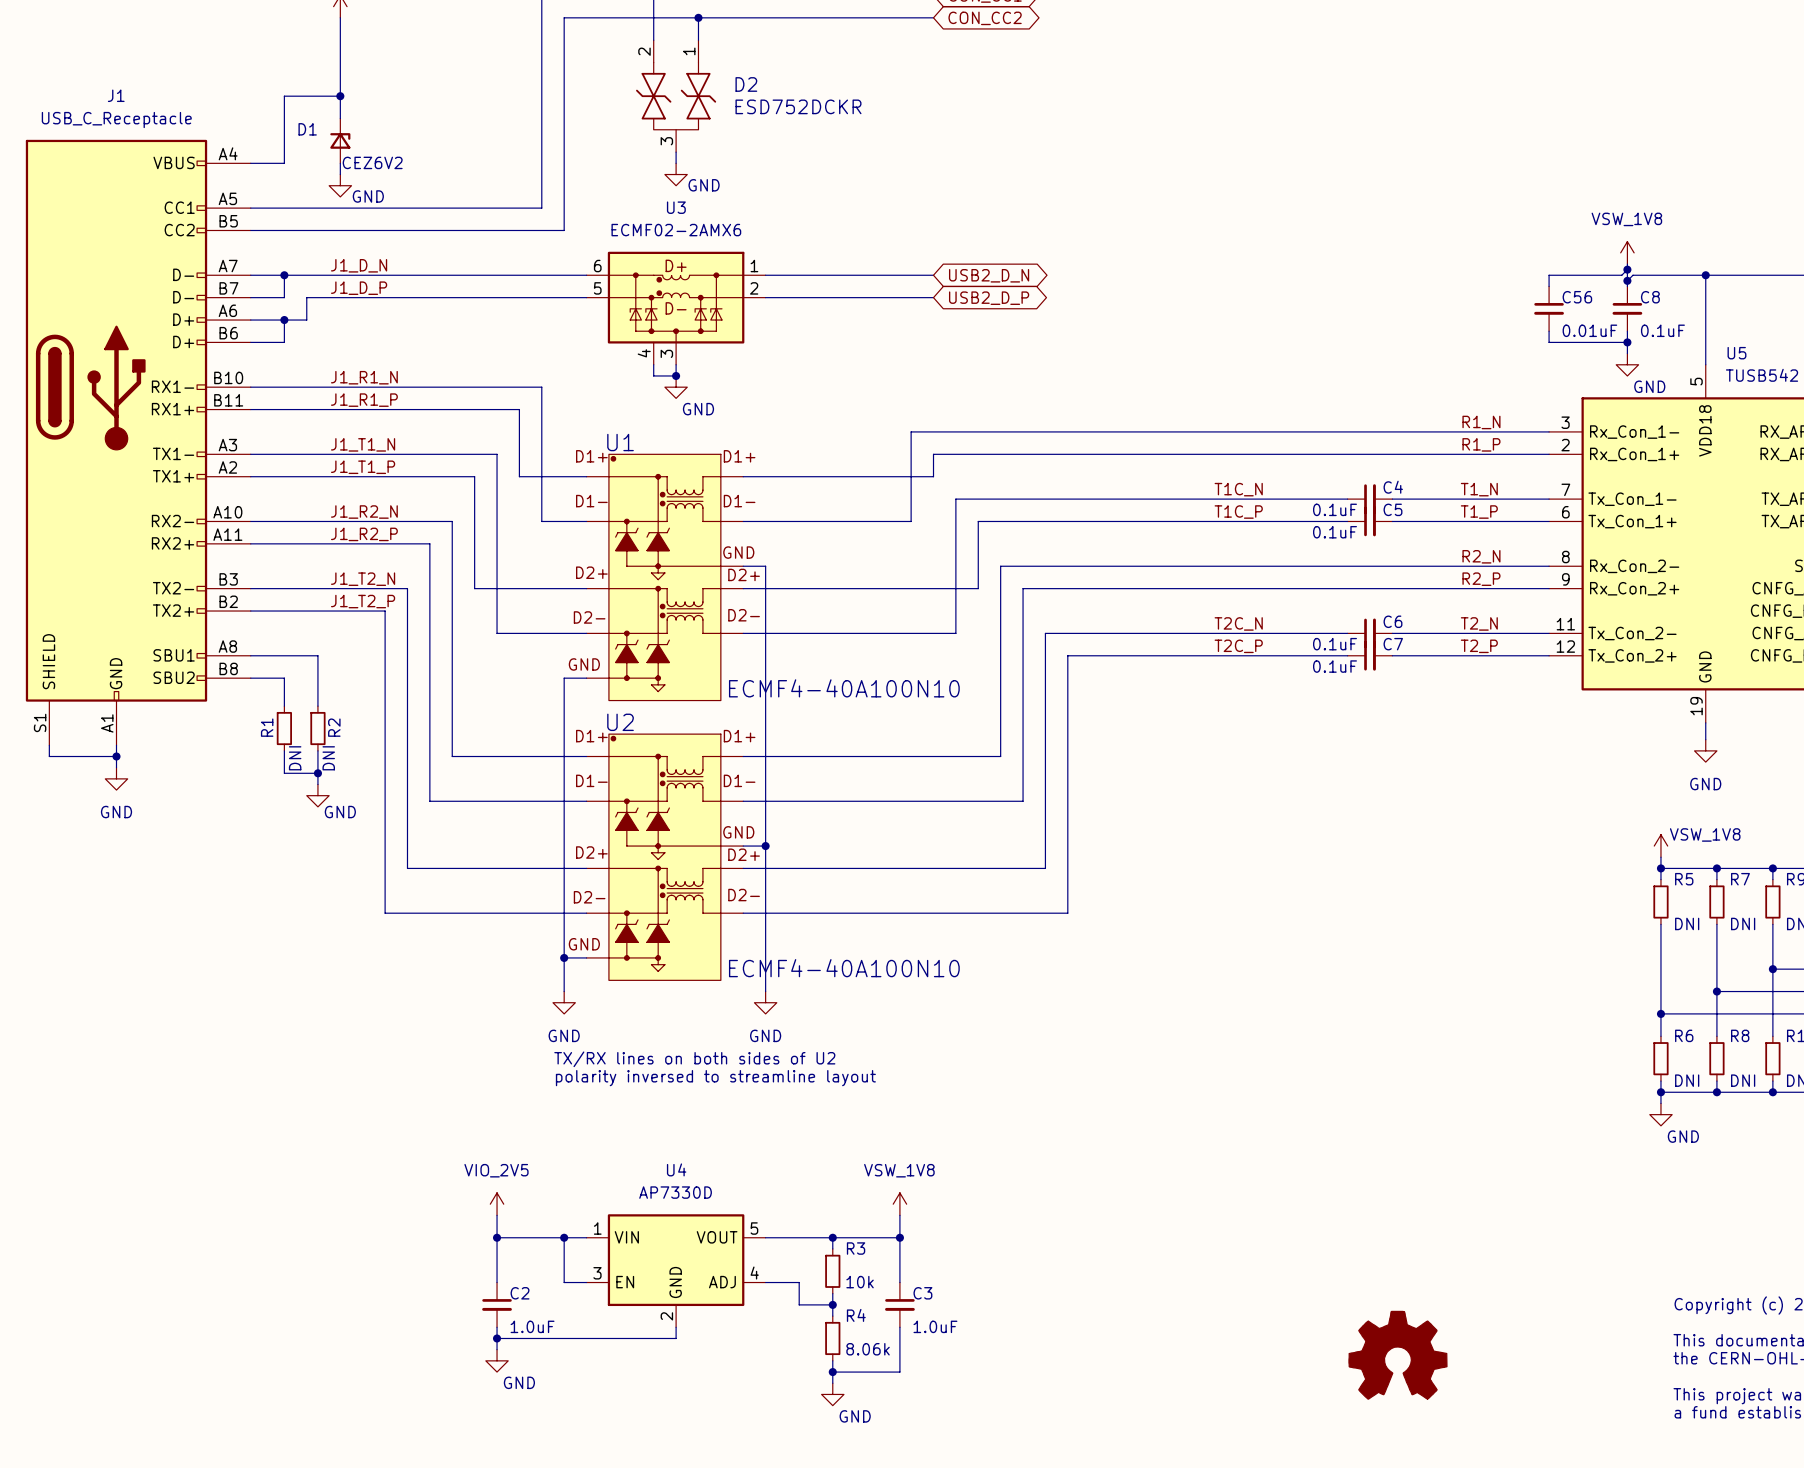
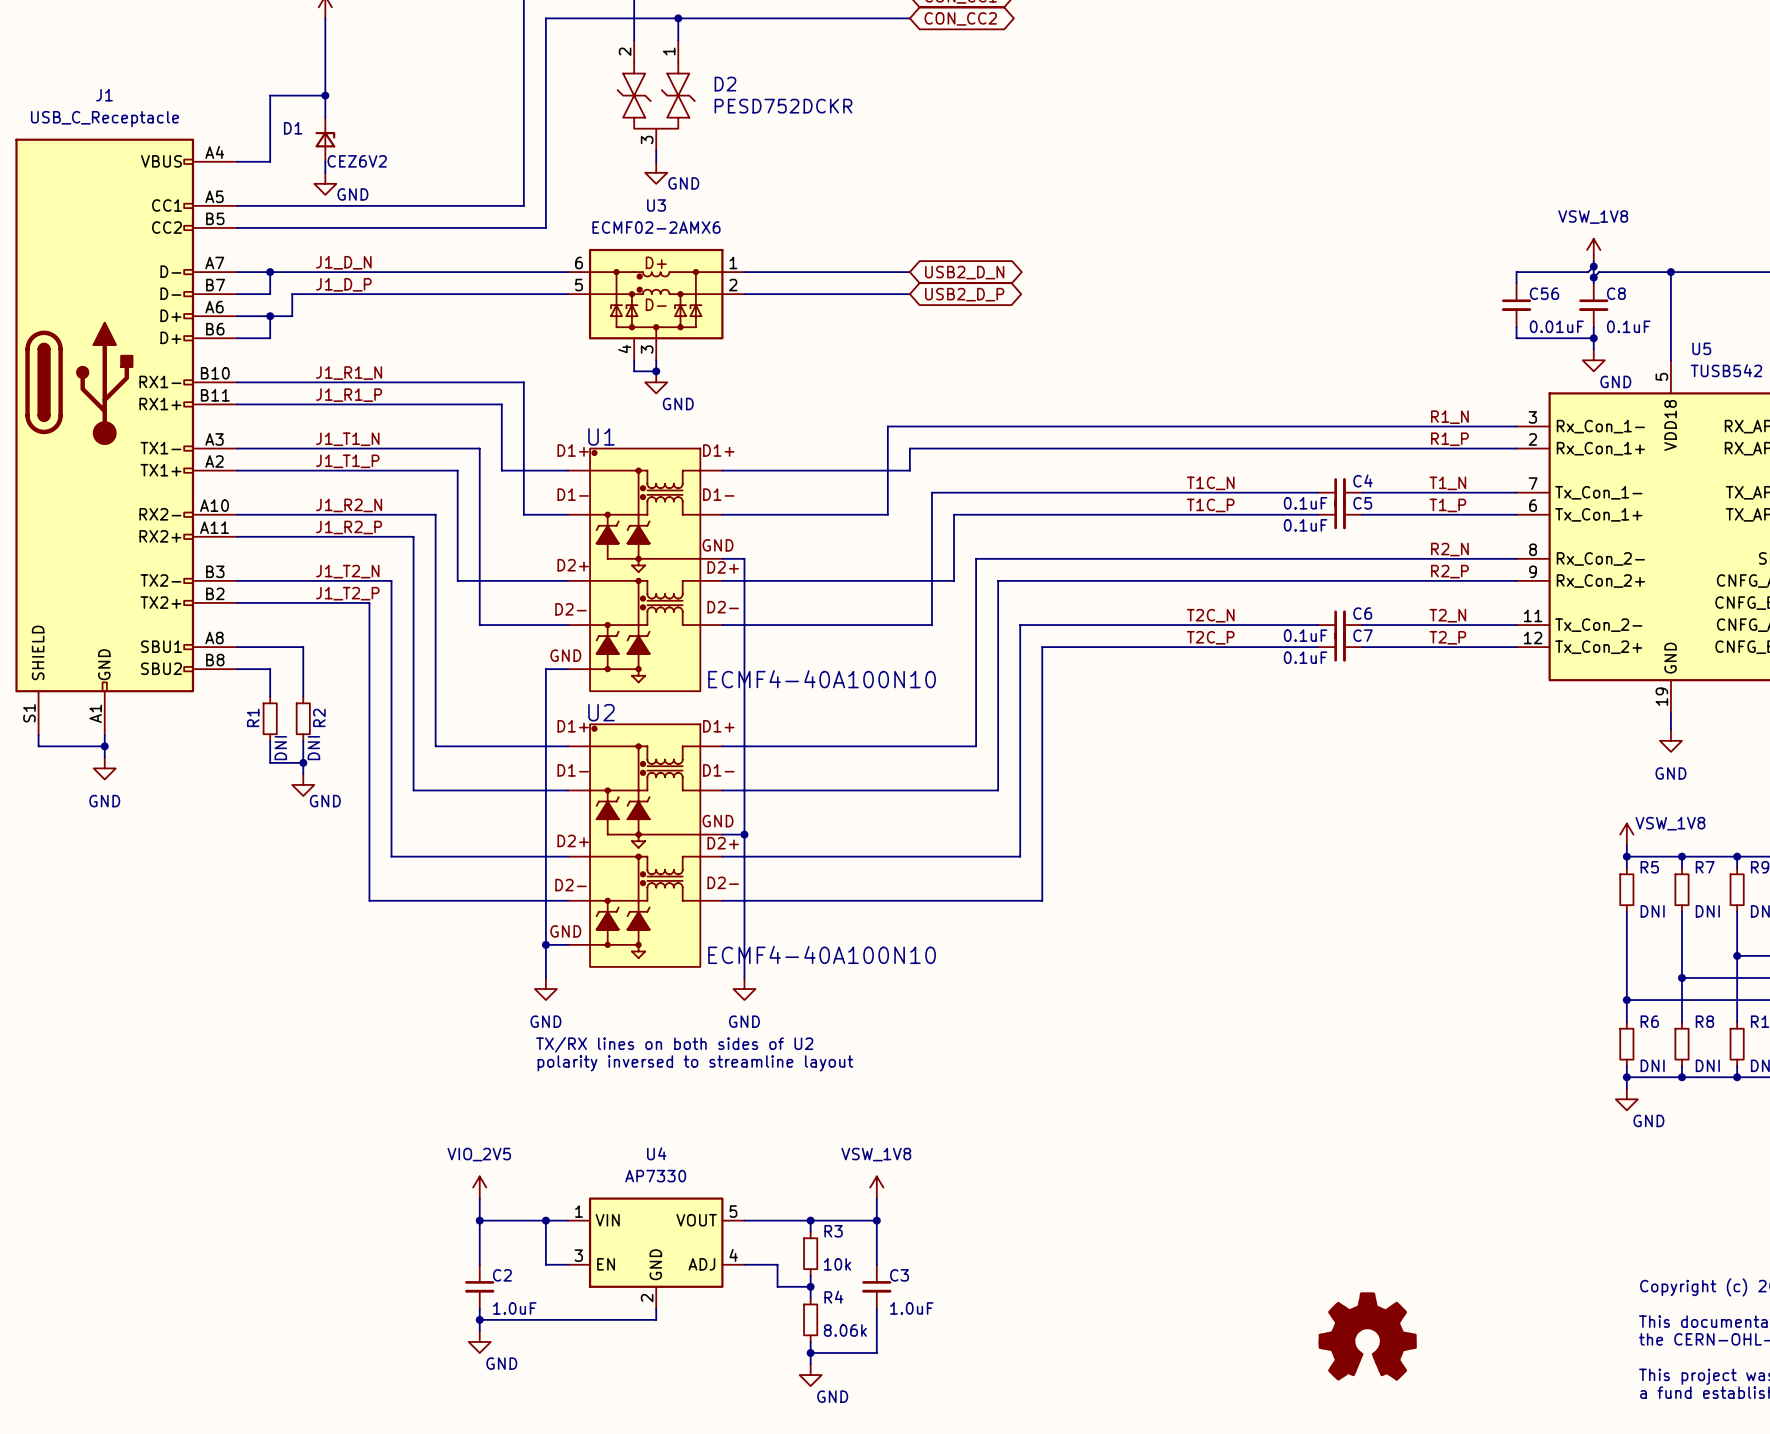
D2 value: ESD752DCKR (798, 106) -> PESD752DCKR (783, 106)
U4 value: AP7330D (675, 1192) -> AP7330 (655, 1176)

